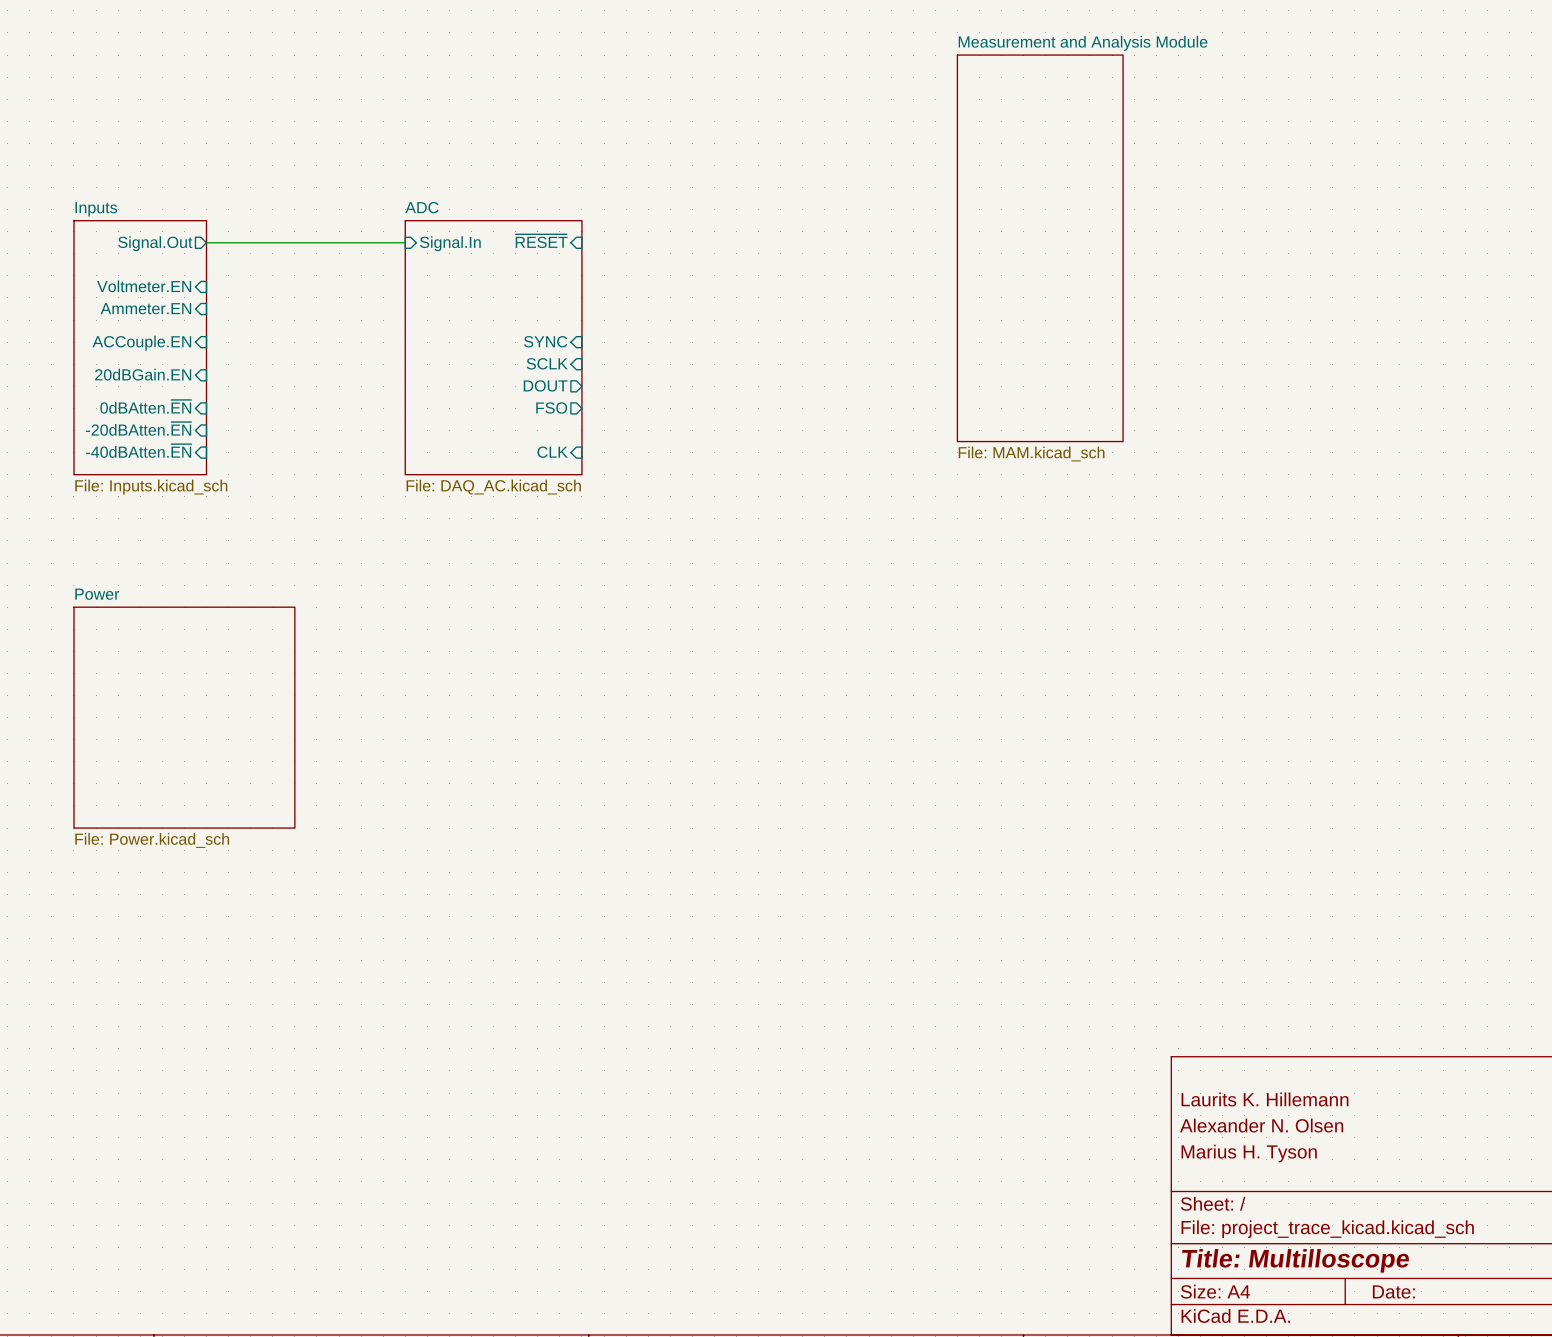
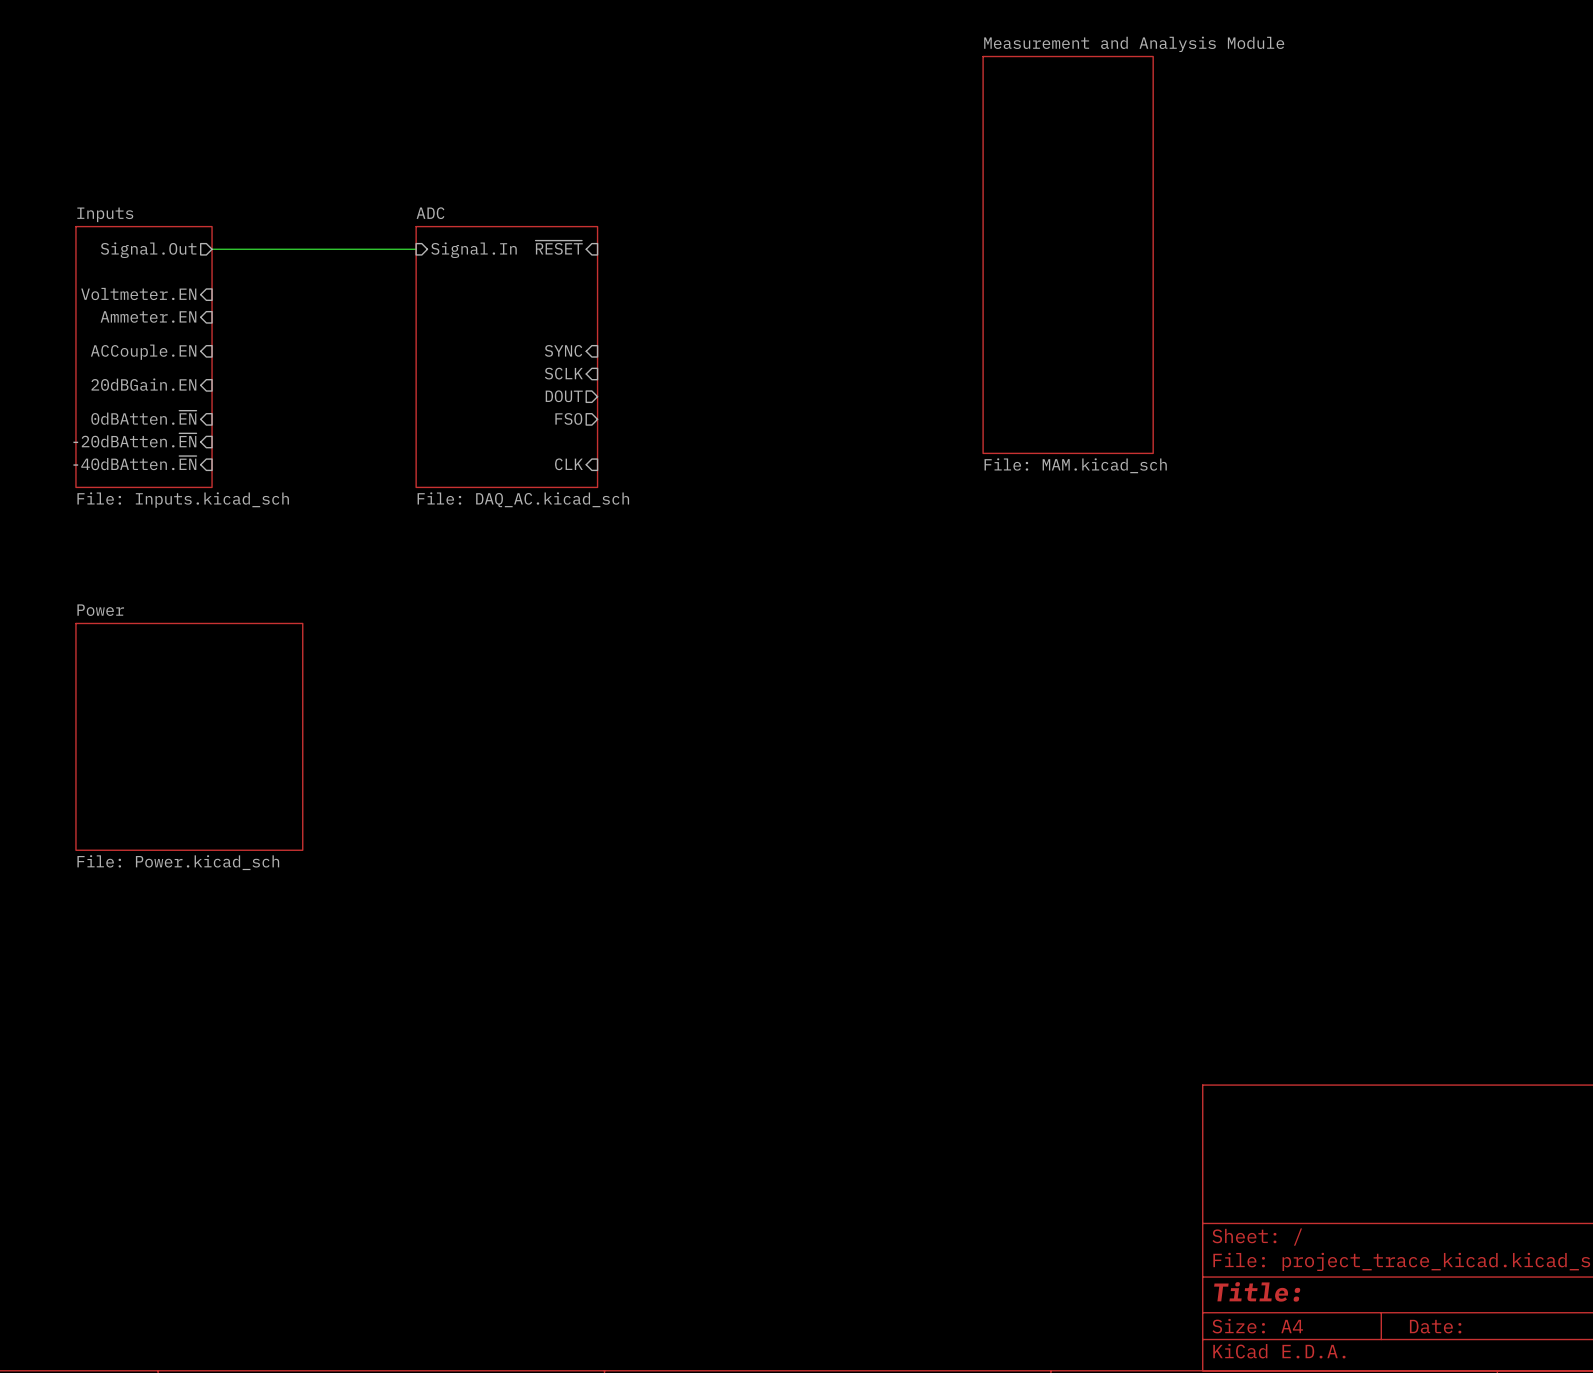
title block: Laurits K. Hillemann (1264, 1099) -> none
title block: Alexander N. Olsen (1261, 1125) -> none
title block: Marius H. Tyson (1249, 1153) -> none
title block: Title: Multilloscope (1295, 1260) -> Title: (1257, 1291)

